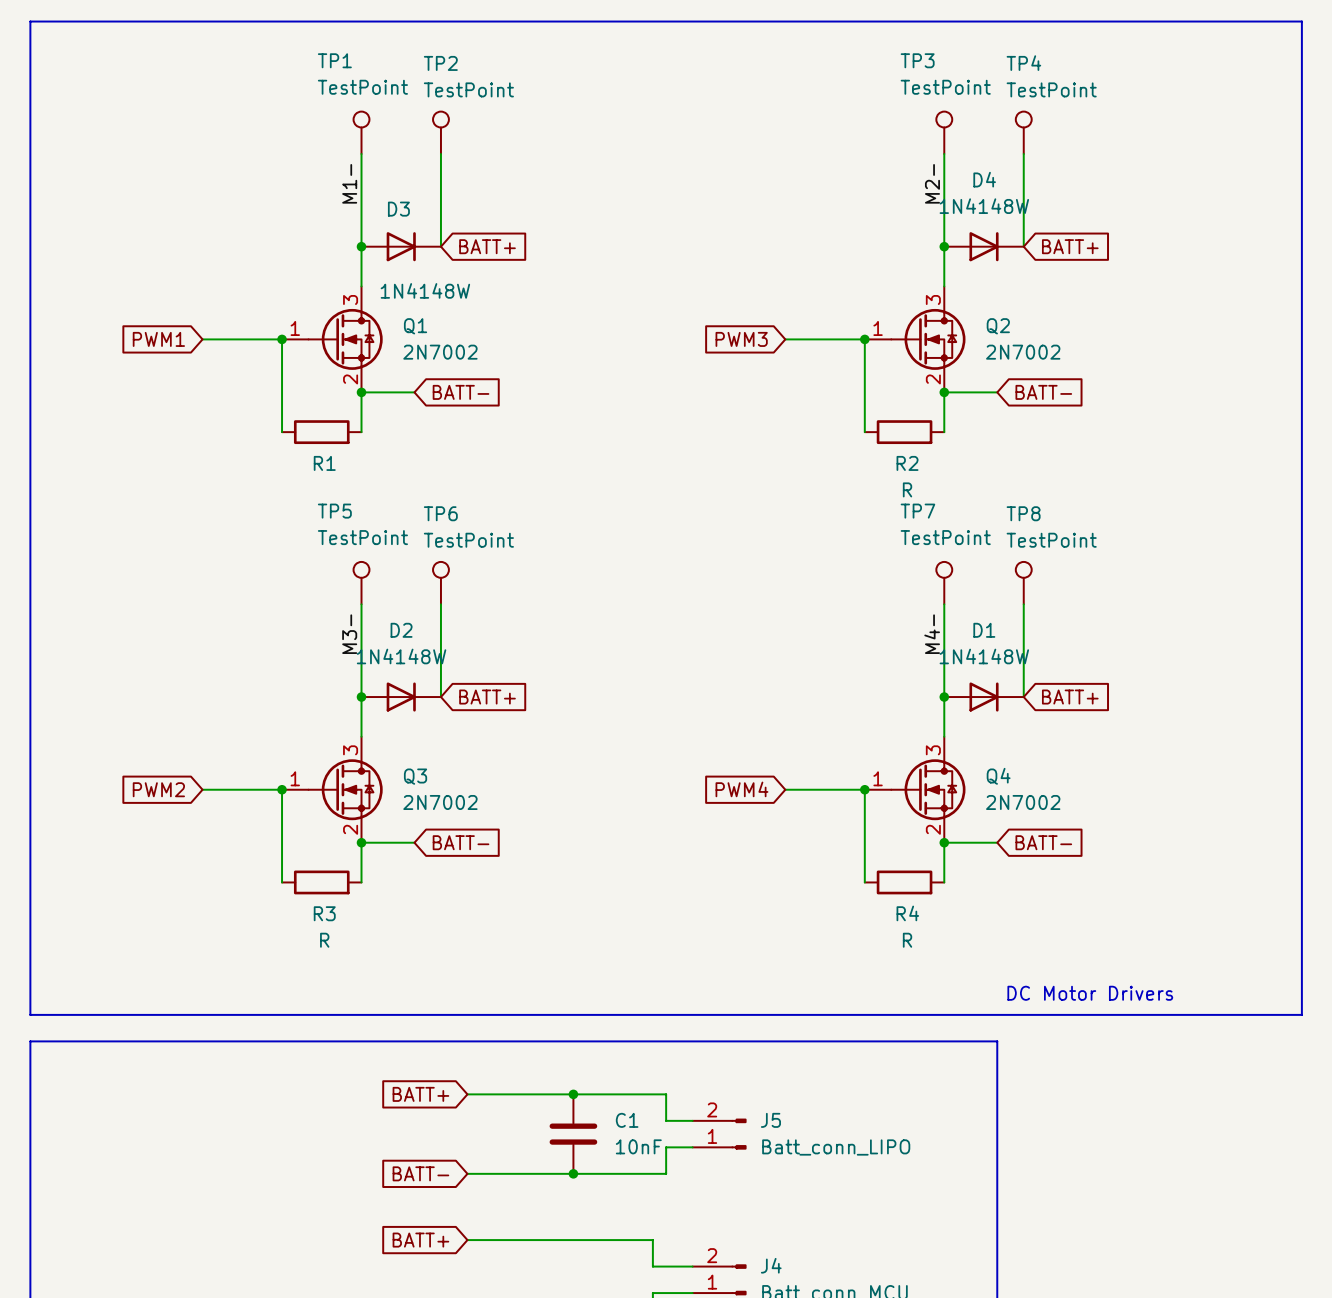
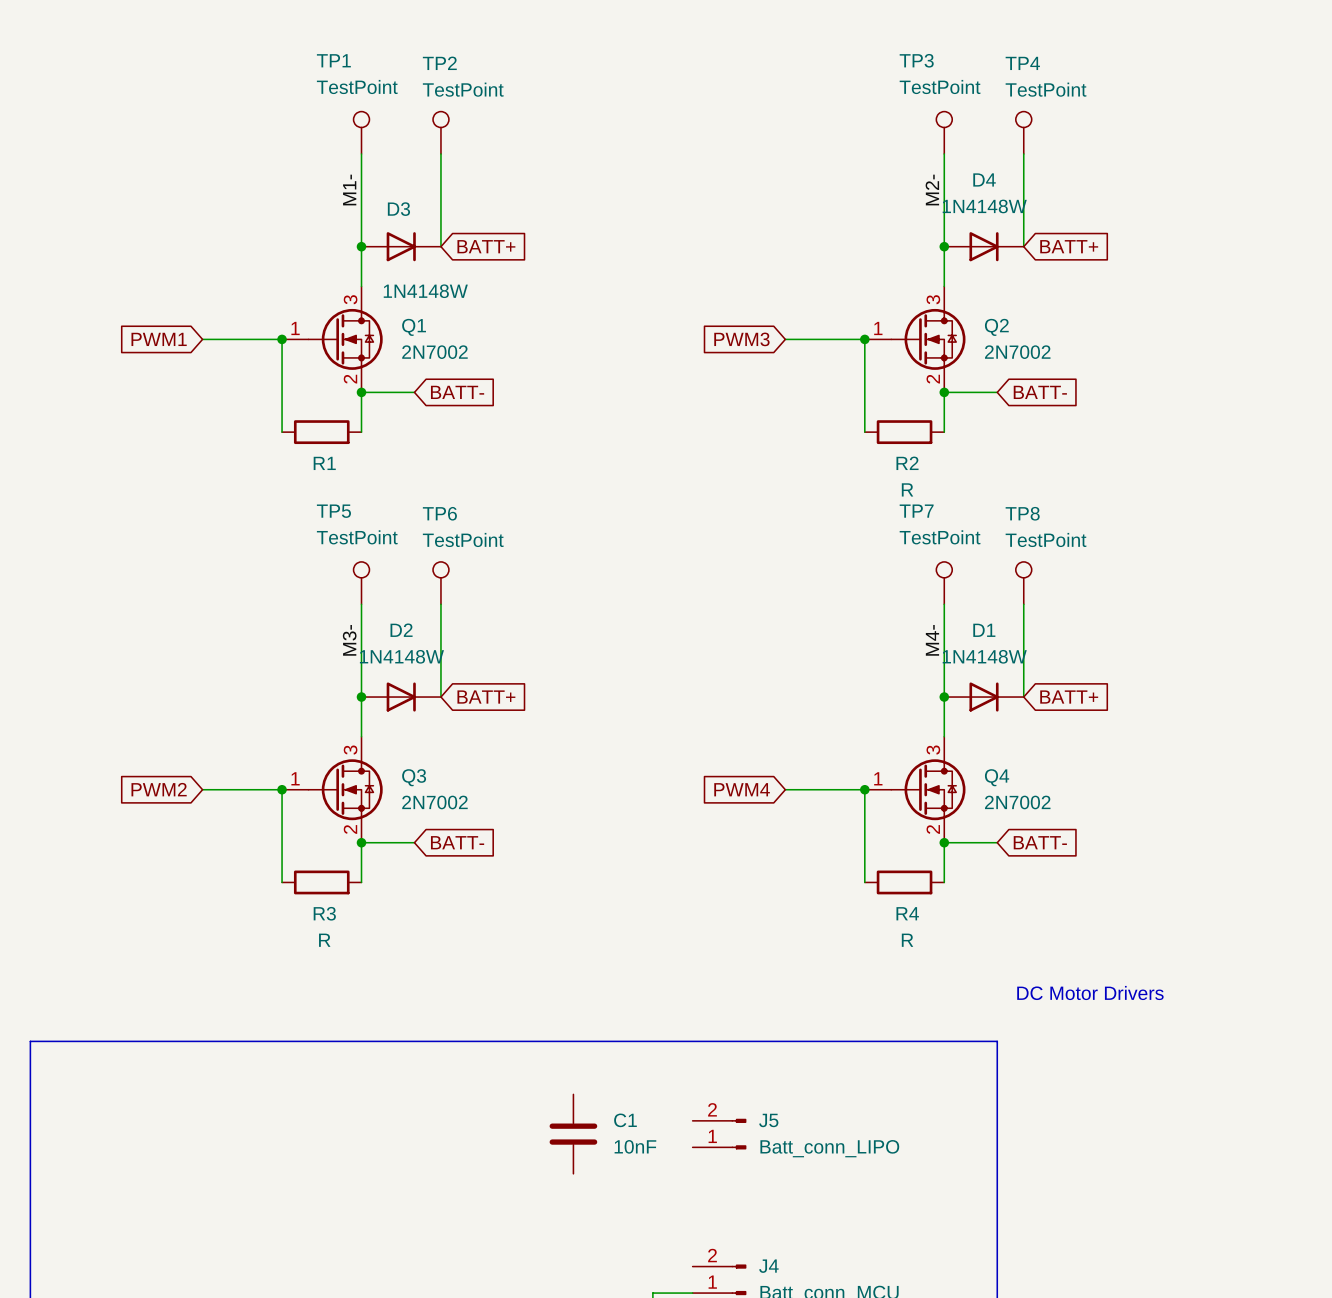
line: (30, 21) (30, 1014) (1301, 1014) (1301, 21) (30, 21) -> none
global label: BATT+ (420, 1094) -> none
wire: (467, 1094) (666, 1094) (666, 1120) (692, 1120) -> none
junction: (573, 1094) -> none
wire: (692, 1147) (666, 1147) (666, 1173) (467, 1173) -> none
global label: BATT- (420, 1173) -> none
junction: (573, 1173) -> none
global label: BATT+ (420, 1240) -> none
wire: (467, 1240) (652, 1240) (652, 1266) (692, 1266) -> none

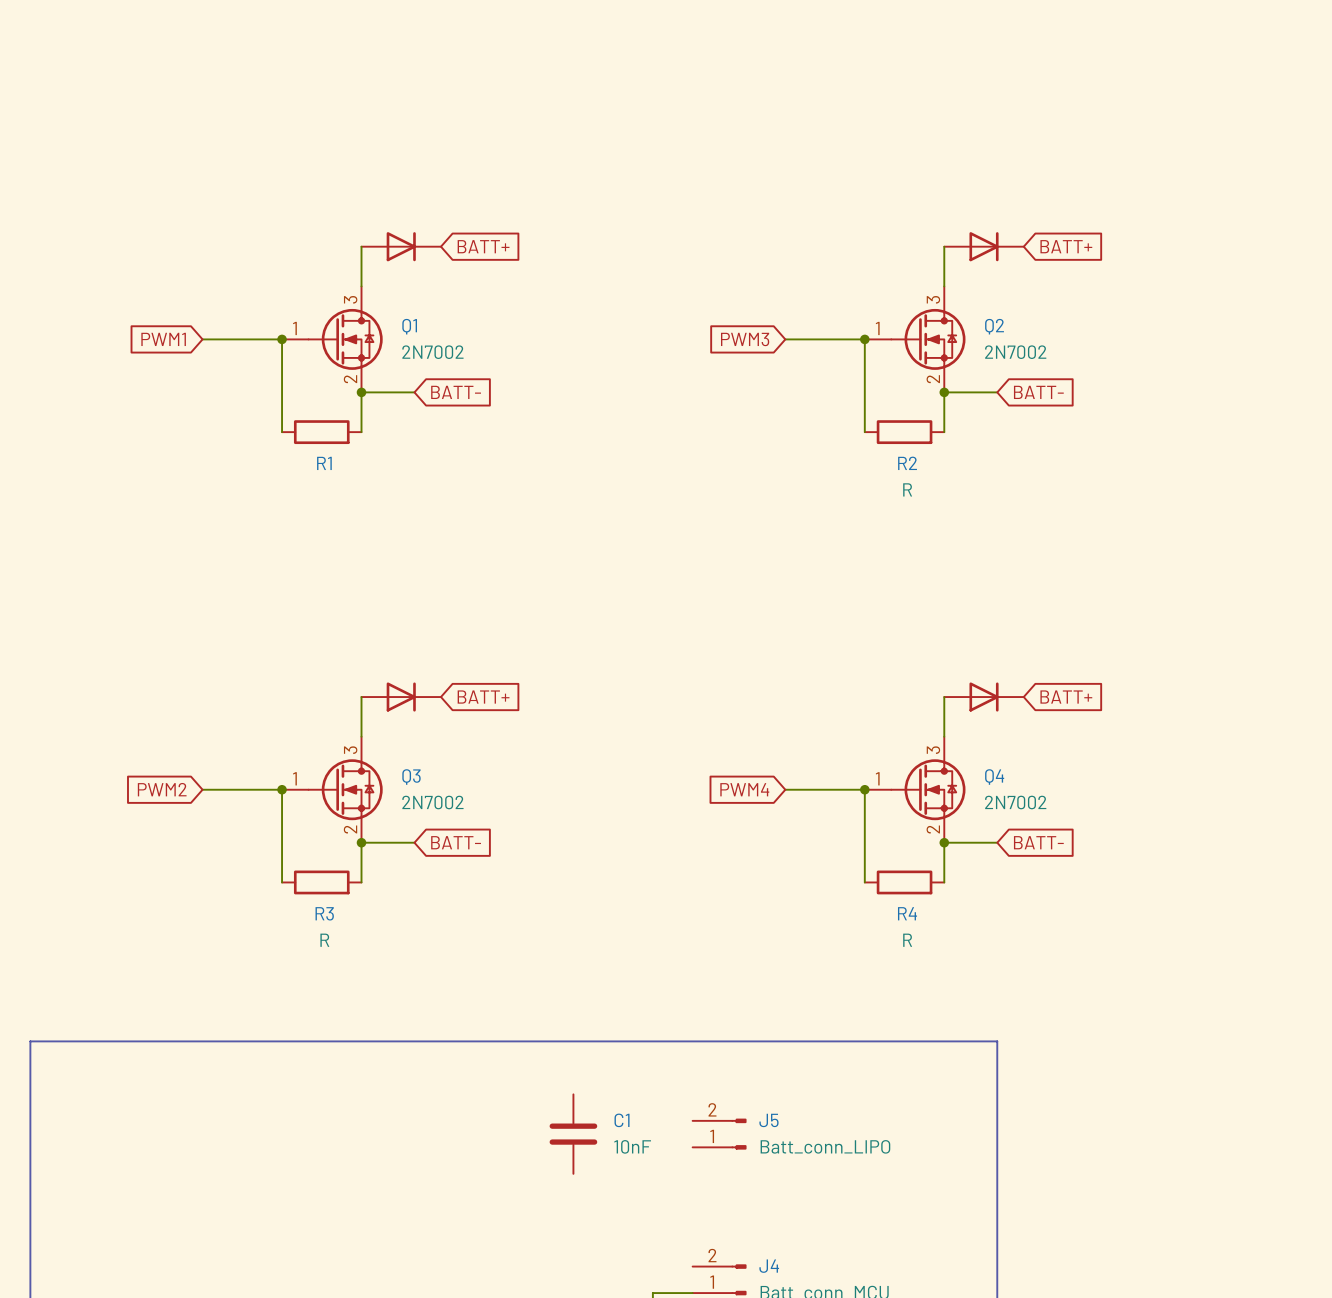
TP1: TestPoint (361, 132) -> none
TP2: TestPoint (440, 132) -> none
TP3: TestPoint (944, 132) -> none
TP4: TestPoint (1023, 132) -> none
wire: (361, 153) (361, 246) -> none
wire: (440, 153) (440, 246) -> none
wire: (944, 153) (944, 246) -> none
wire: (1023, 153) (1023, 246) -> none
D4 name: D4 (984, 179) -> none
label: M1- (349, 190) -> none
label: M2- (932, 190) -> none
D4 value: 1N4148W (984, 206) -> none
D3 name: D3 (398, 209) -> none
junction: (361, 246) -> none
junction: (944, 246) -> none
D3 value: 1N4148W (425, 291) -> none
TP5: TestPoint (361, 583) -> none
TP6: TestPoint (440, 583) -> none
TP7: TestPoint (944, 583) -> none
TP8: TestPoint (1023, 583) -> none
wire: (361, 604) (361, 697) -> none
wire: (440, 604) (440, 697) -> none
wire: (944, 604) (944, 697) -> none
wire: (1023, 604) (1023, 697) -> none
D2 name: D2 (401, 630) -> none
D1 name: D1 (984, 630) -> none
label: M3- (349, 640) -> none
label: M4- (932, 640) -> none
D2 value: 1N4148W (401, 656) -> none
D1 value: 1N4148W (984, 656) -> none
junction: (361, 697) -> none
junction: (944, 697) -> none
text: DC Motor Drivers (1090, 993) -> none

